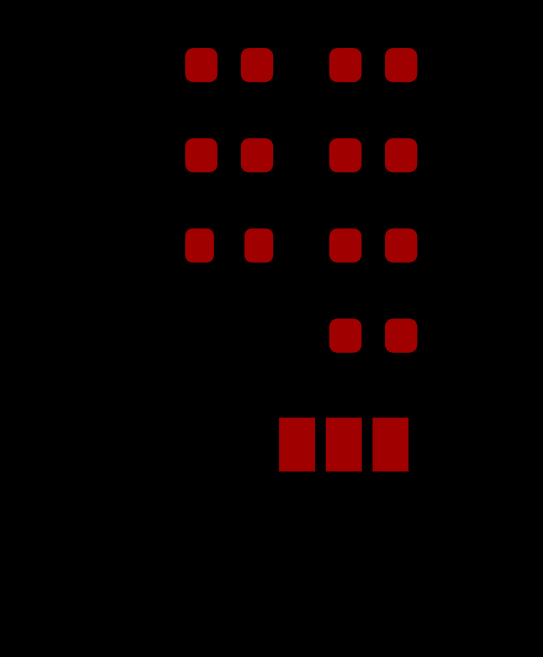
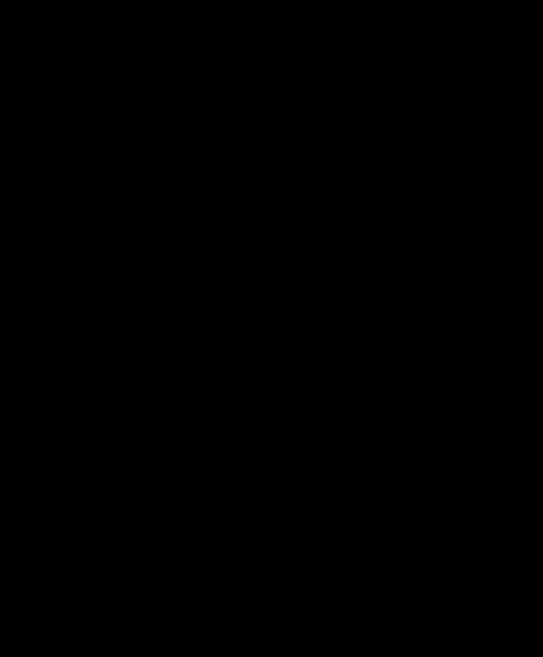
part: (229, 65) -> none
part: (373, 65) -> none
part: (229, 155) -> none
part: (373, 155) -> none
part: (229, 245) -> none
part: (373, 245) -> none
part: (373, 335) -> none
part: (343, 444) -> none

